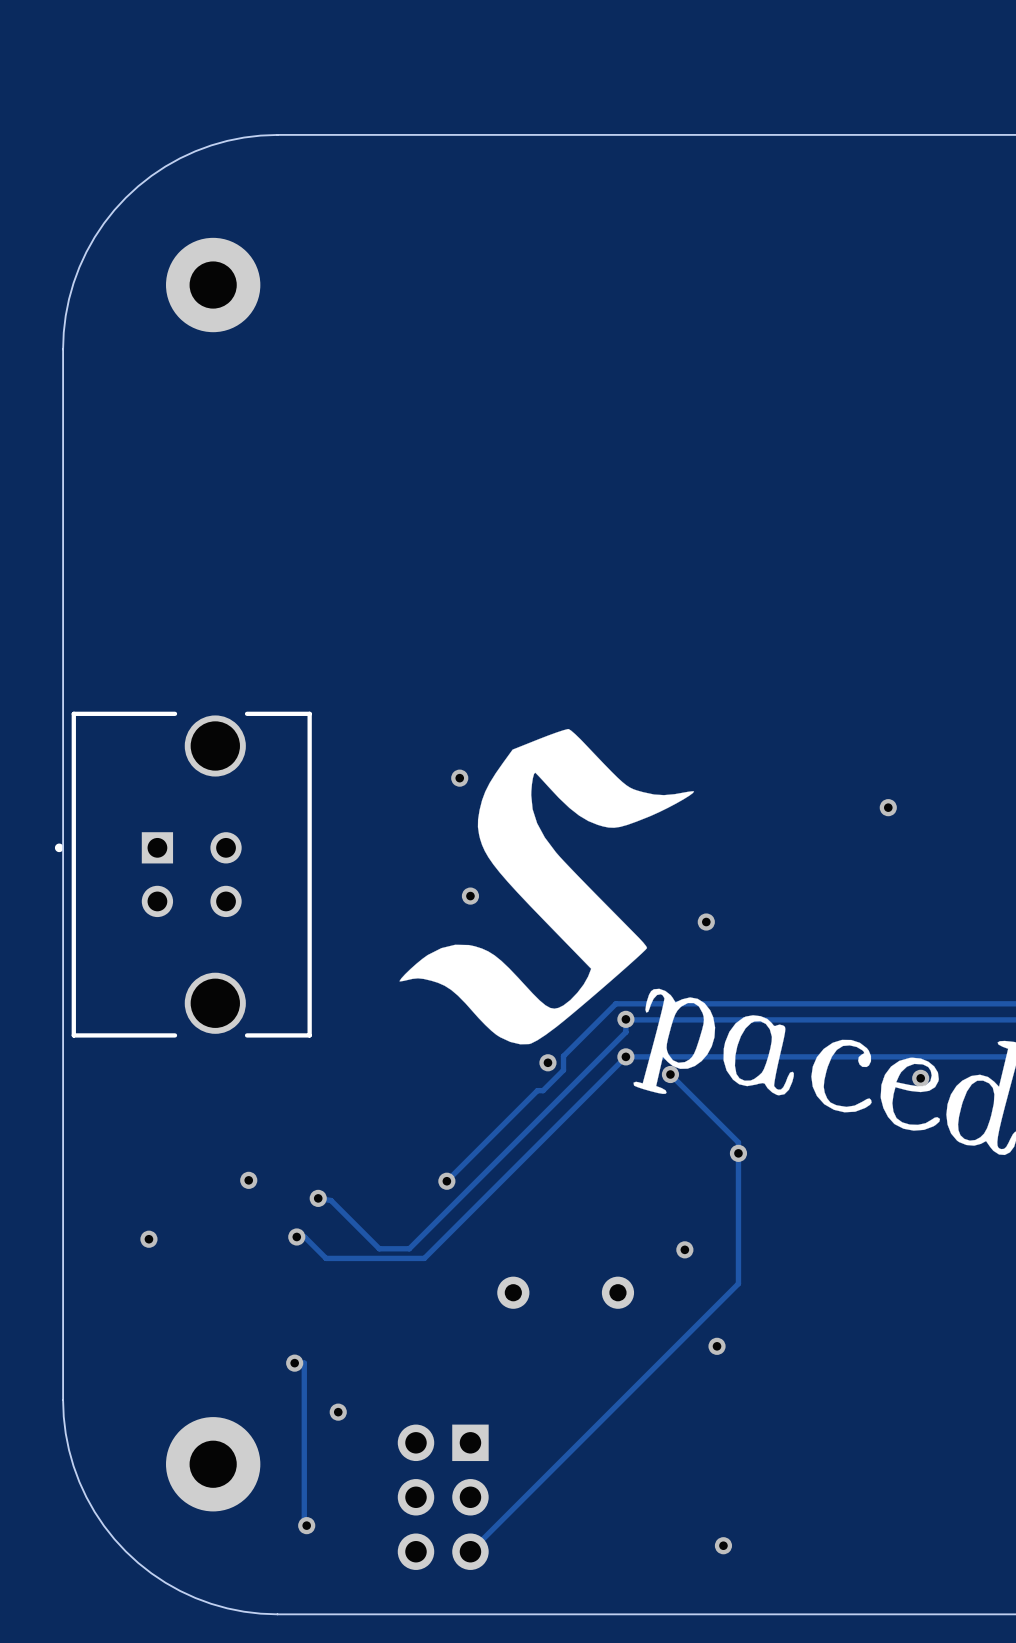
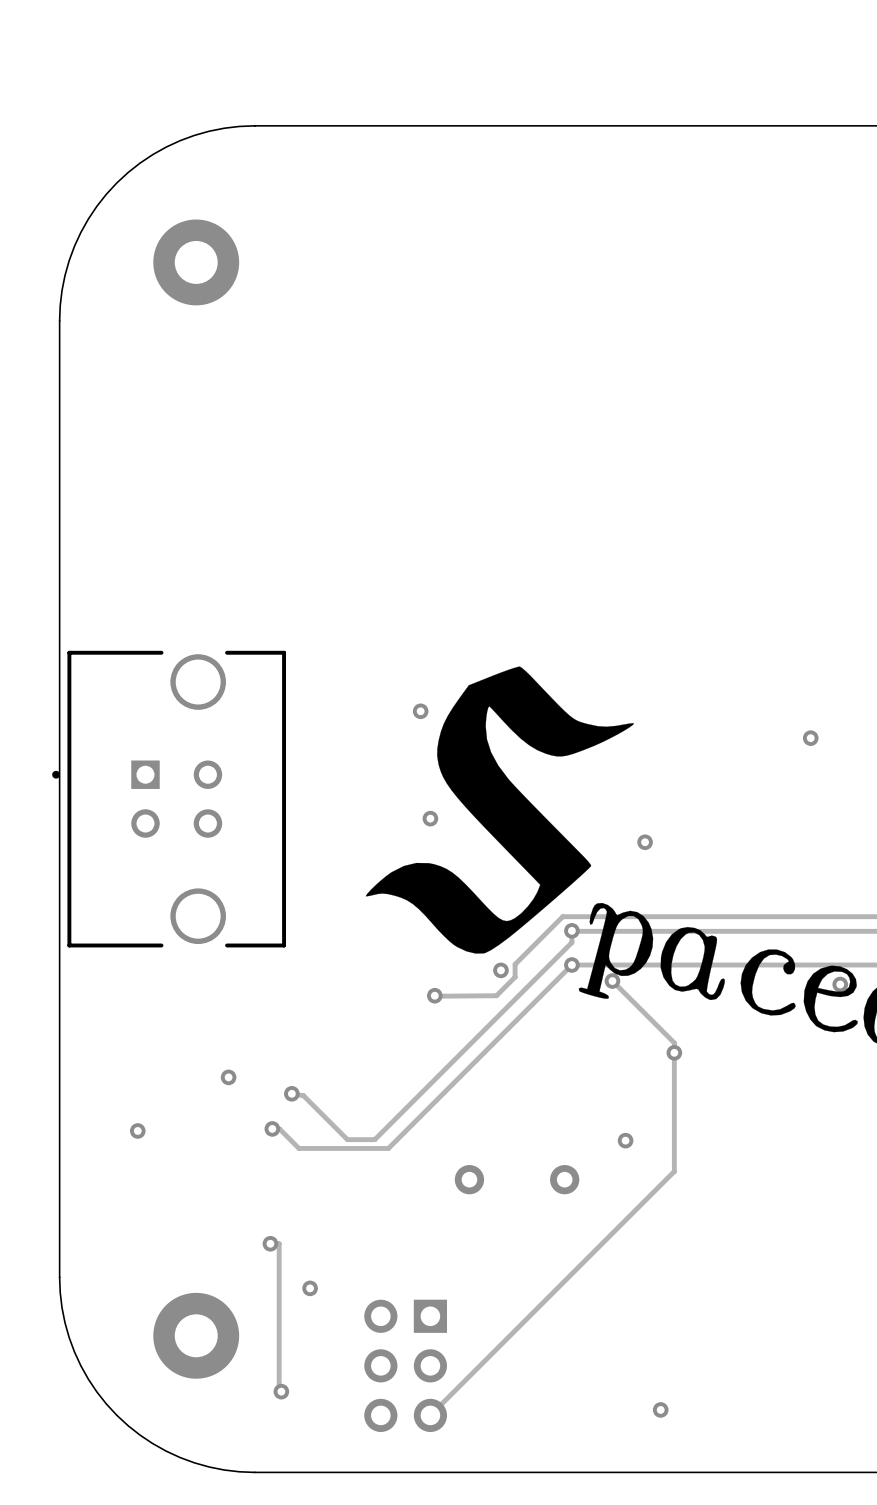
track: (543, 1090) (537, 1090) (446, 1181) -> (496, 995) (434, 995)
via position: (446, 1181) -> (434, 995)
via: (717, 1346) -> none

